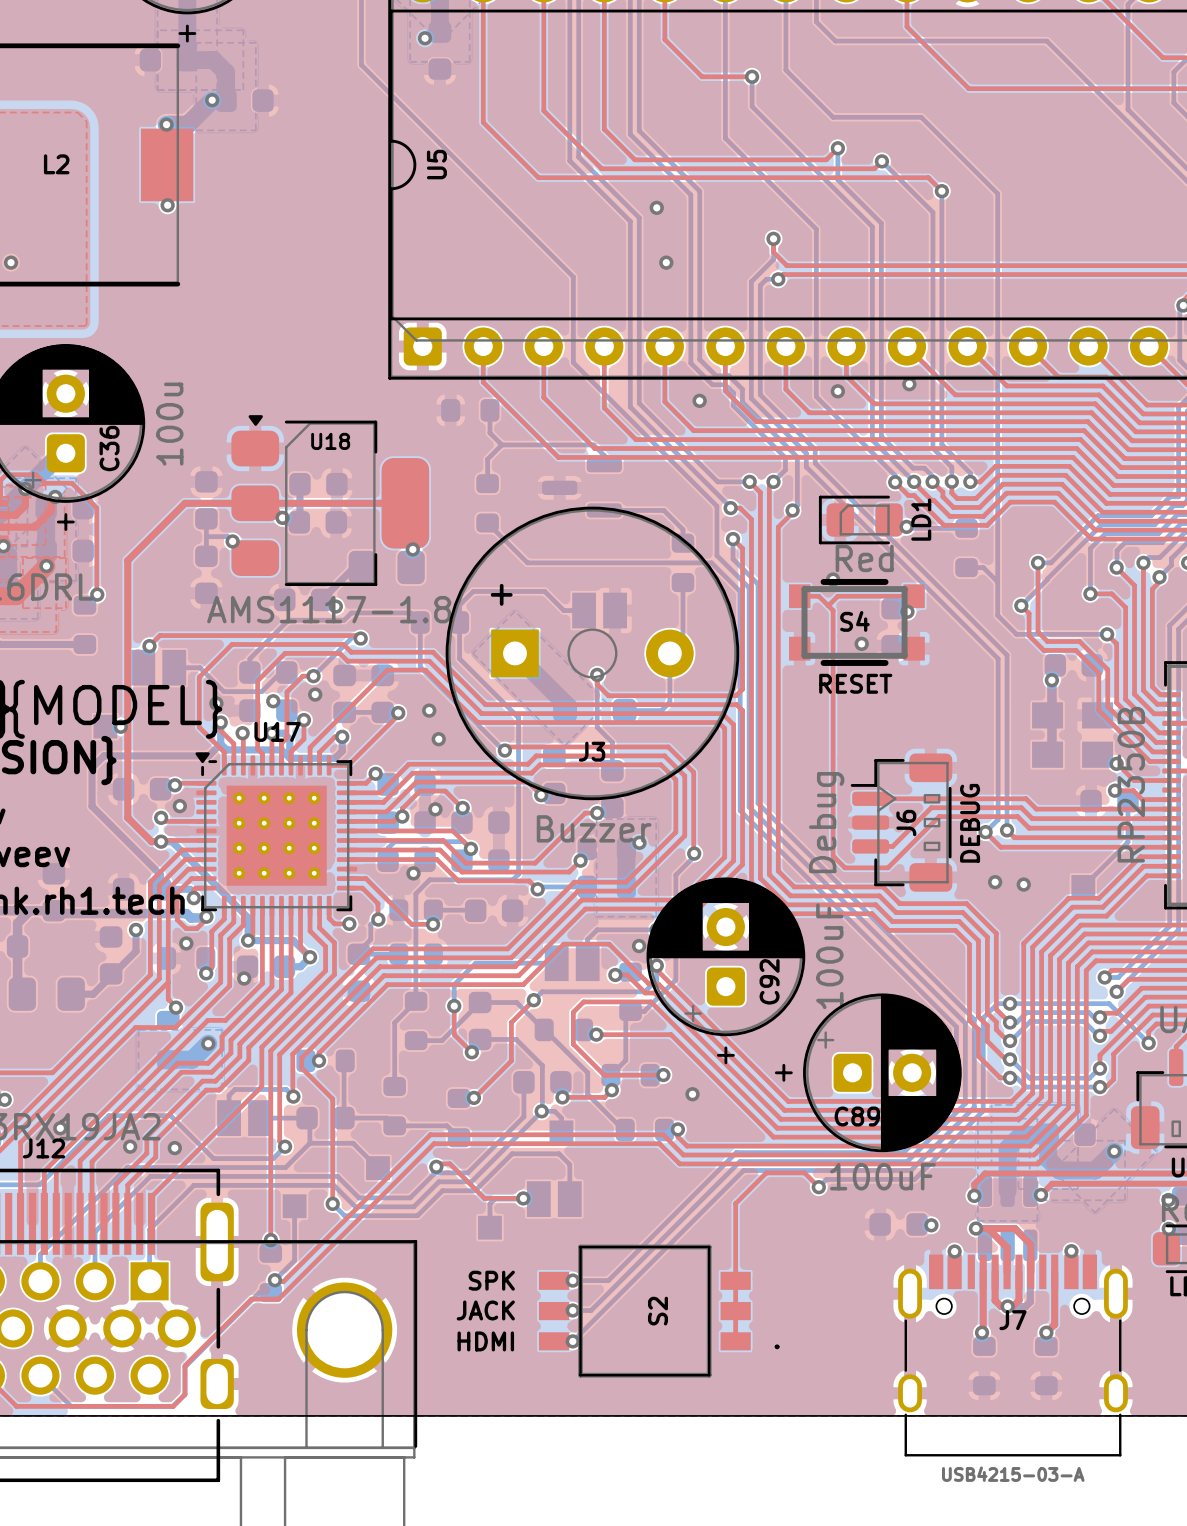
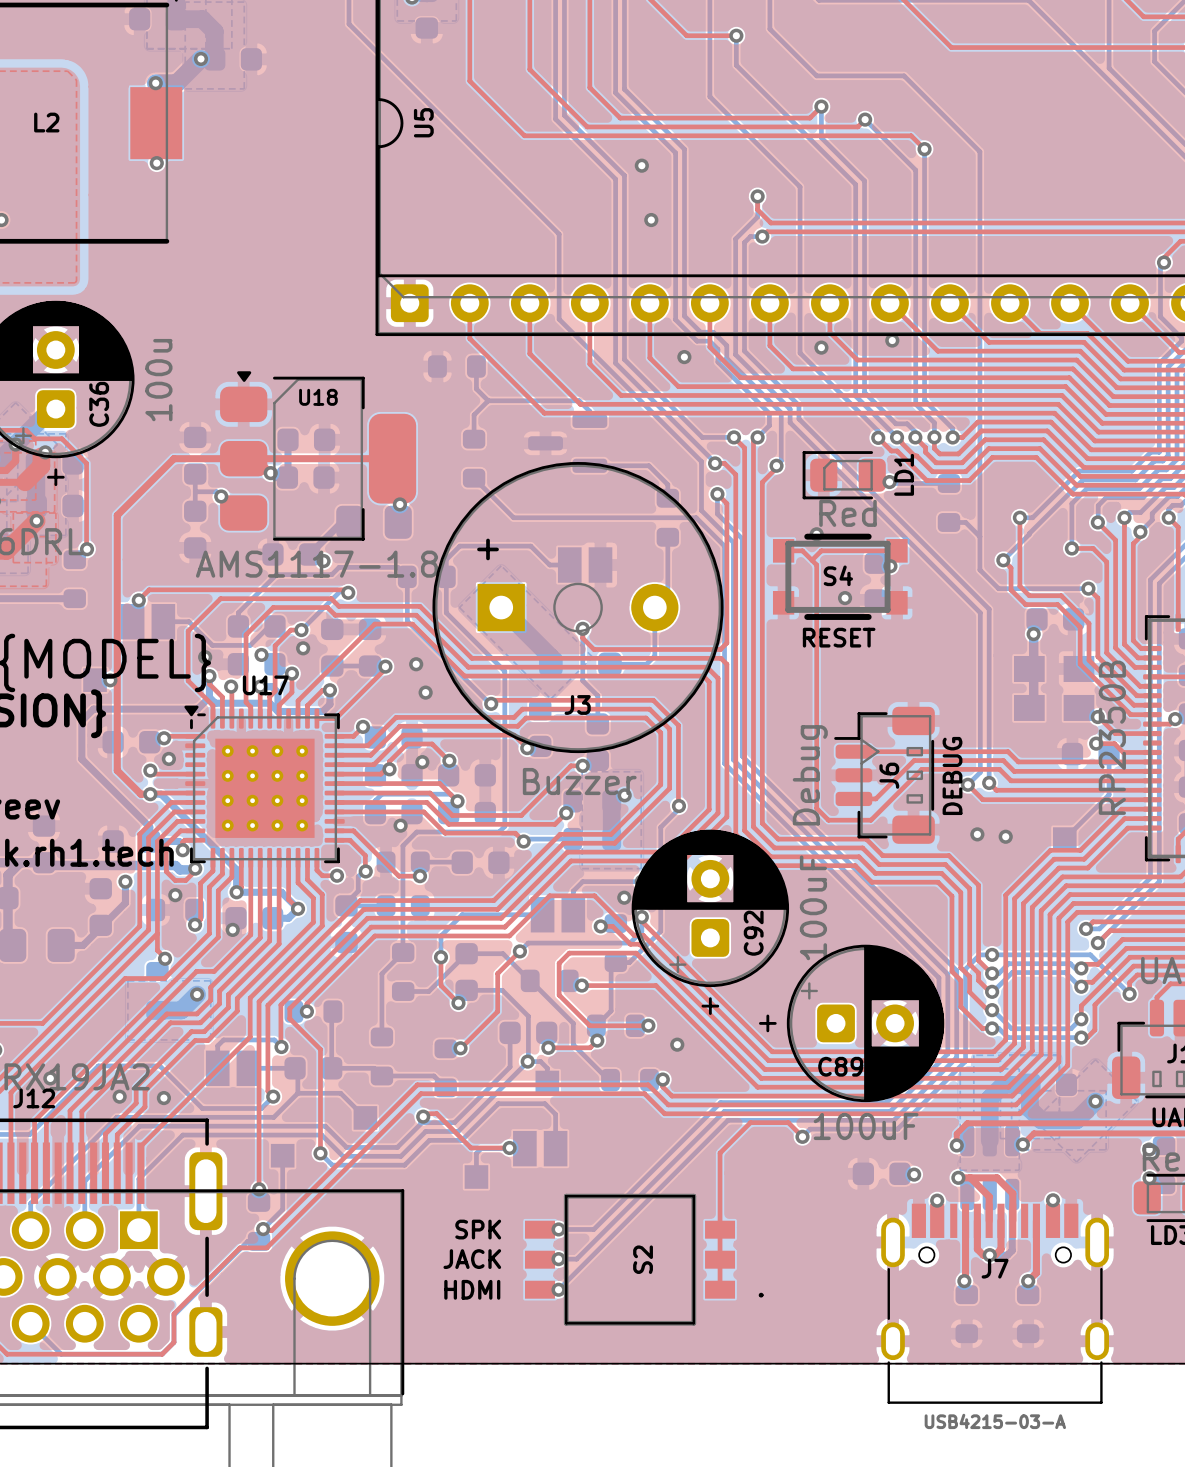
top track width: thin (55, 496) (51, 500) (51, 510) (34, 527) -> thick (45, 452) (41, 456) (41, 466) (25, 482)

